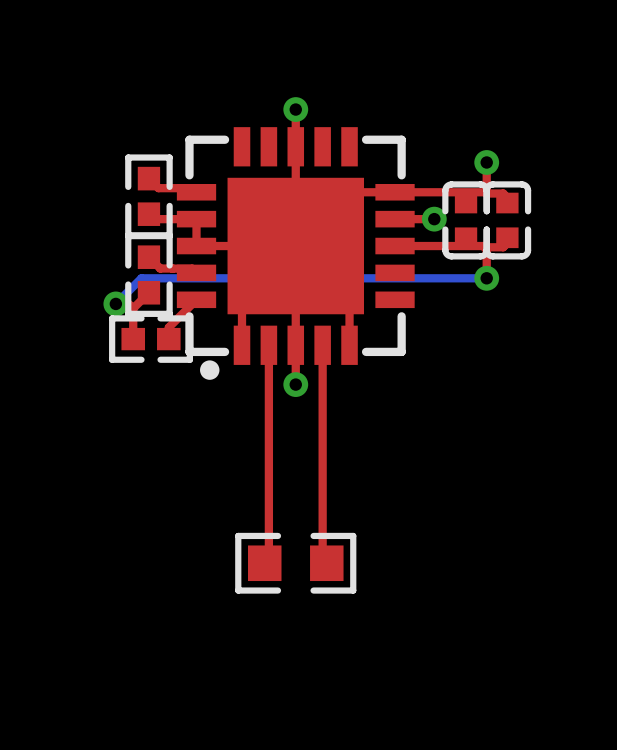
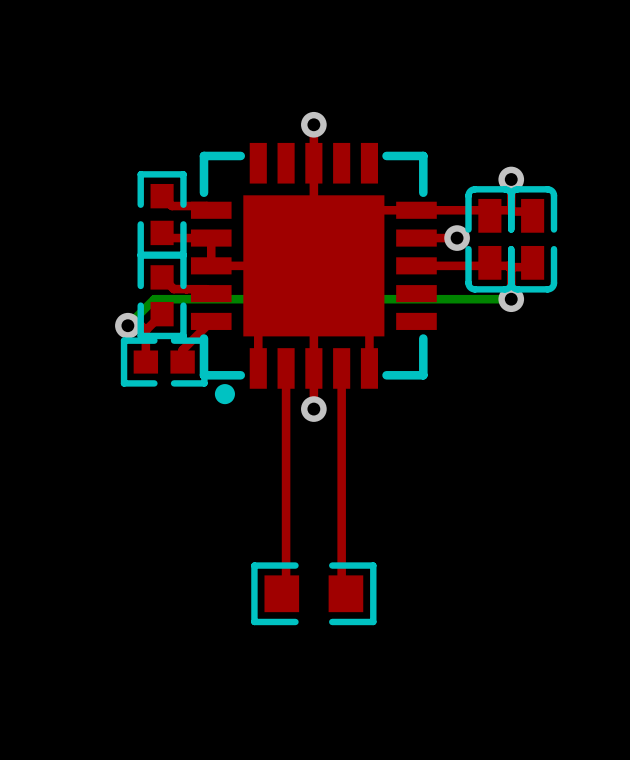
part footprint: [442, 181, 490, 260] -> [465, 186, 515, 293]
part footprint: [483, 181, 532, 260] -> [508, 186, 558, 293]

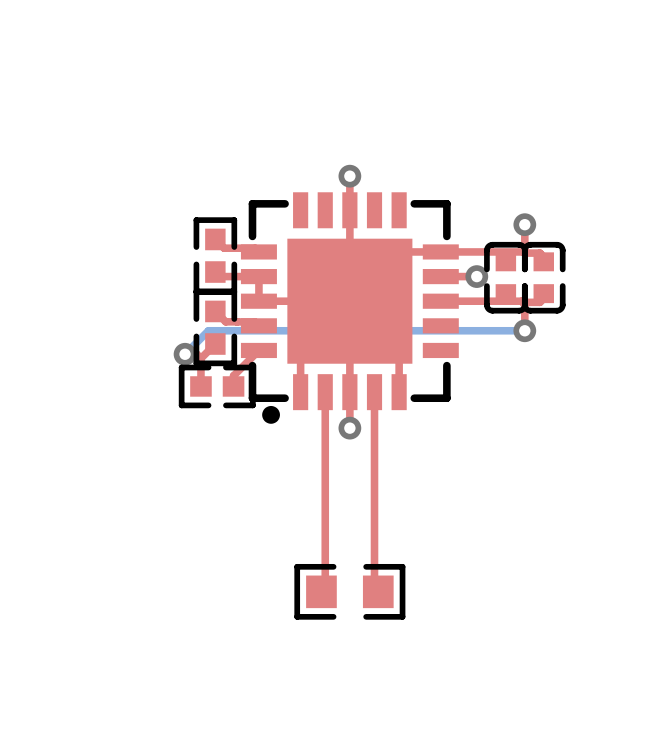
part footprint: [465, 186, 515, 293] -> [484, 241, 528, 314]
part footprint: [508, 186, 558, 293] -> [521, 241, 566, 314]

